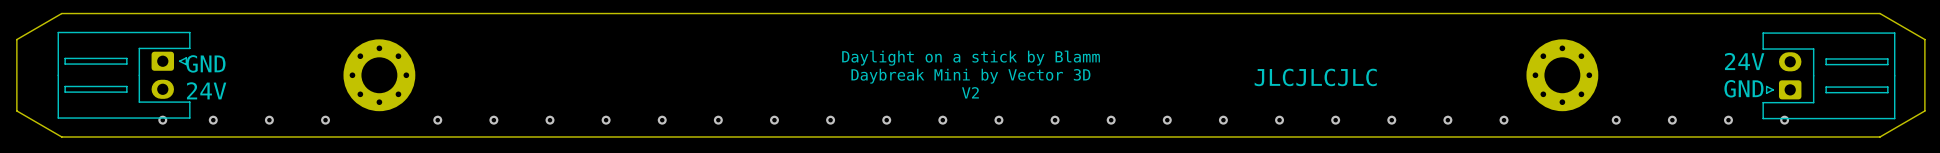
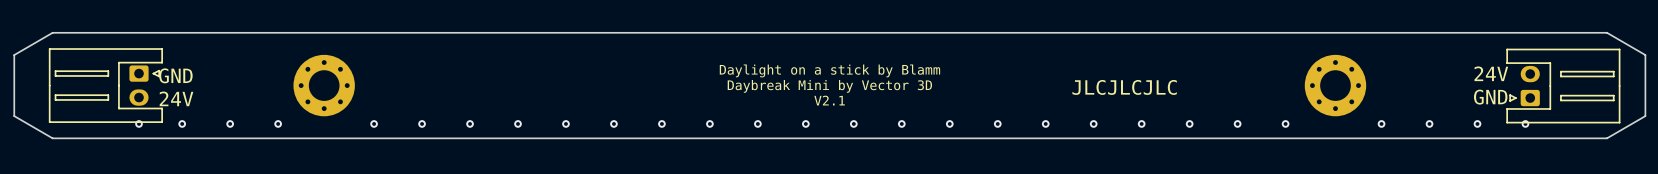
text: V2 (970, 92) -> V2.1 (829, 100)

